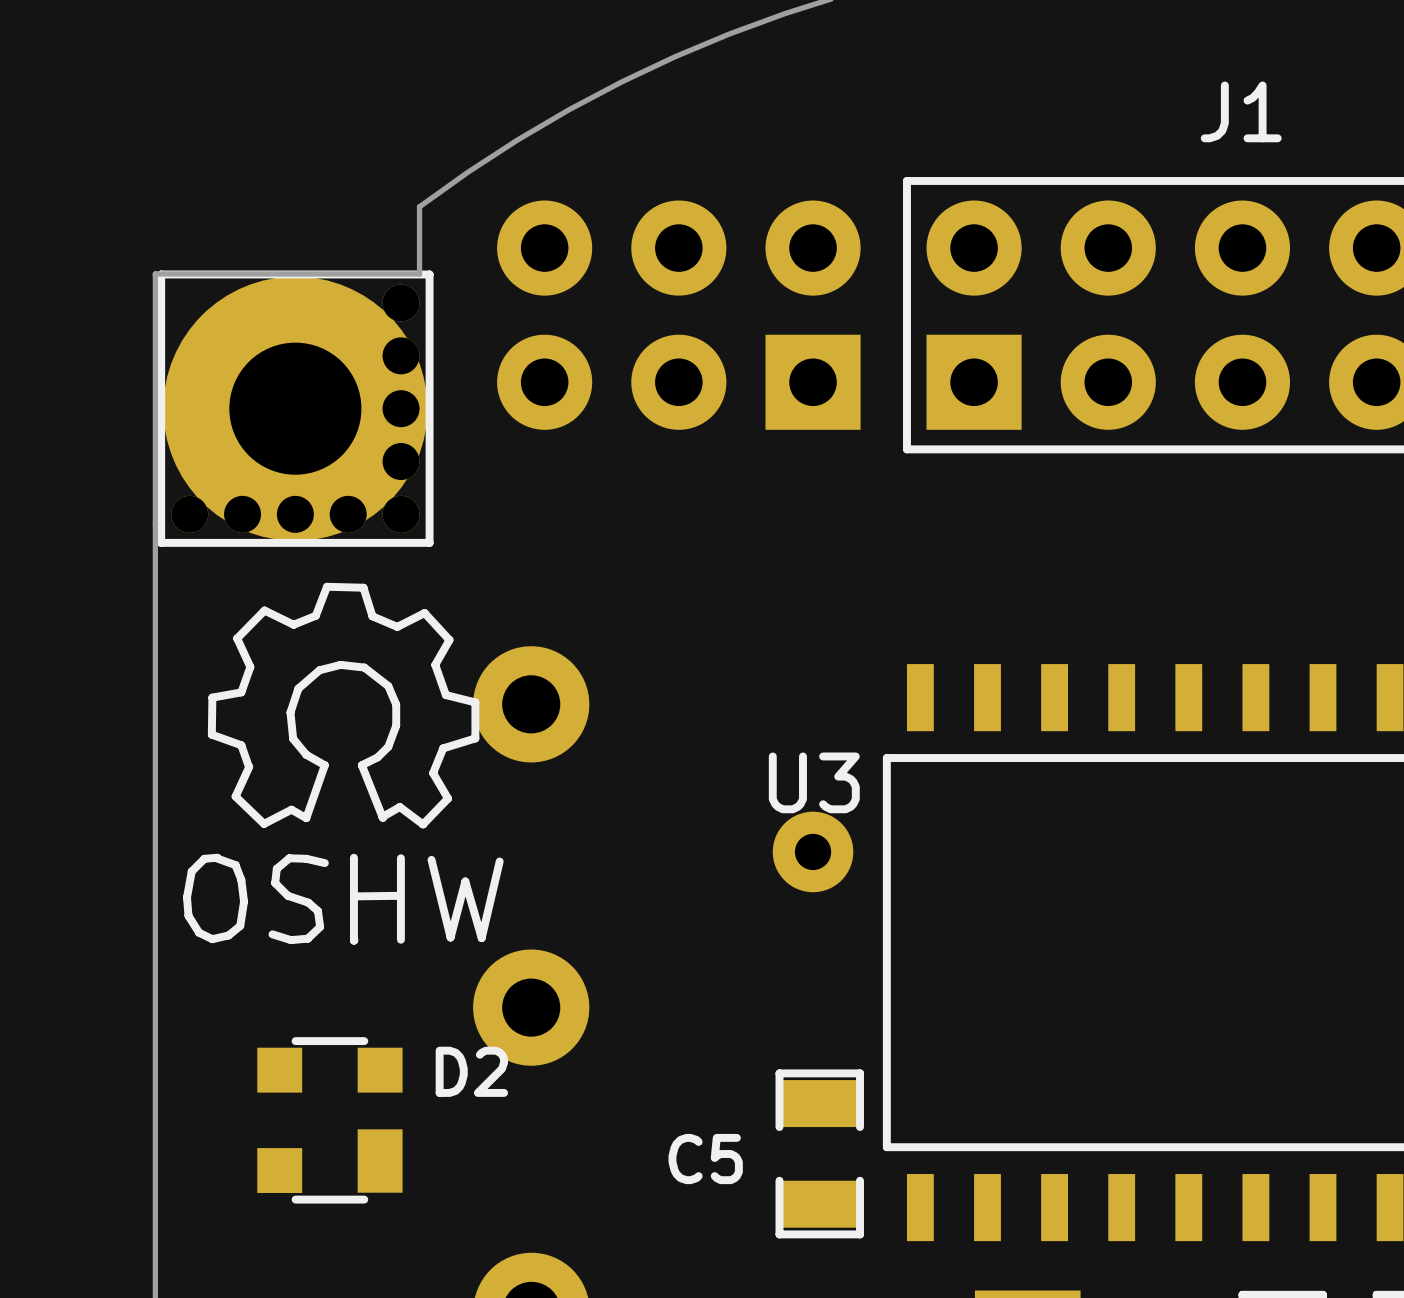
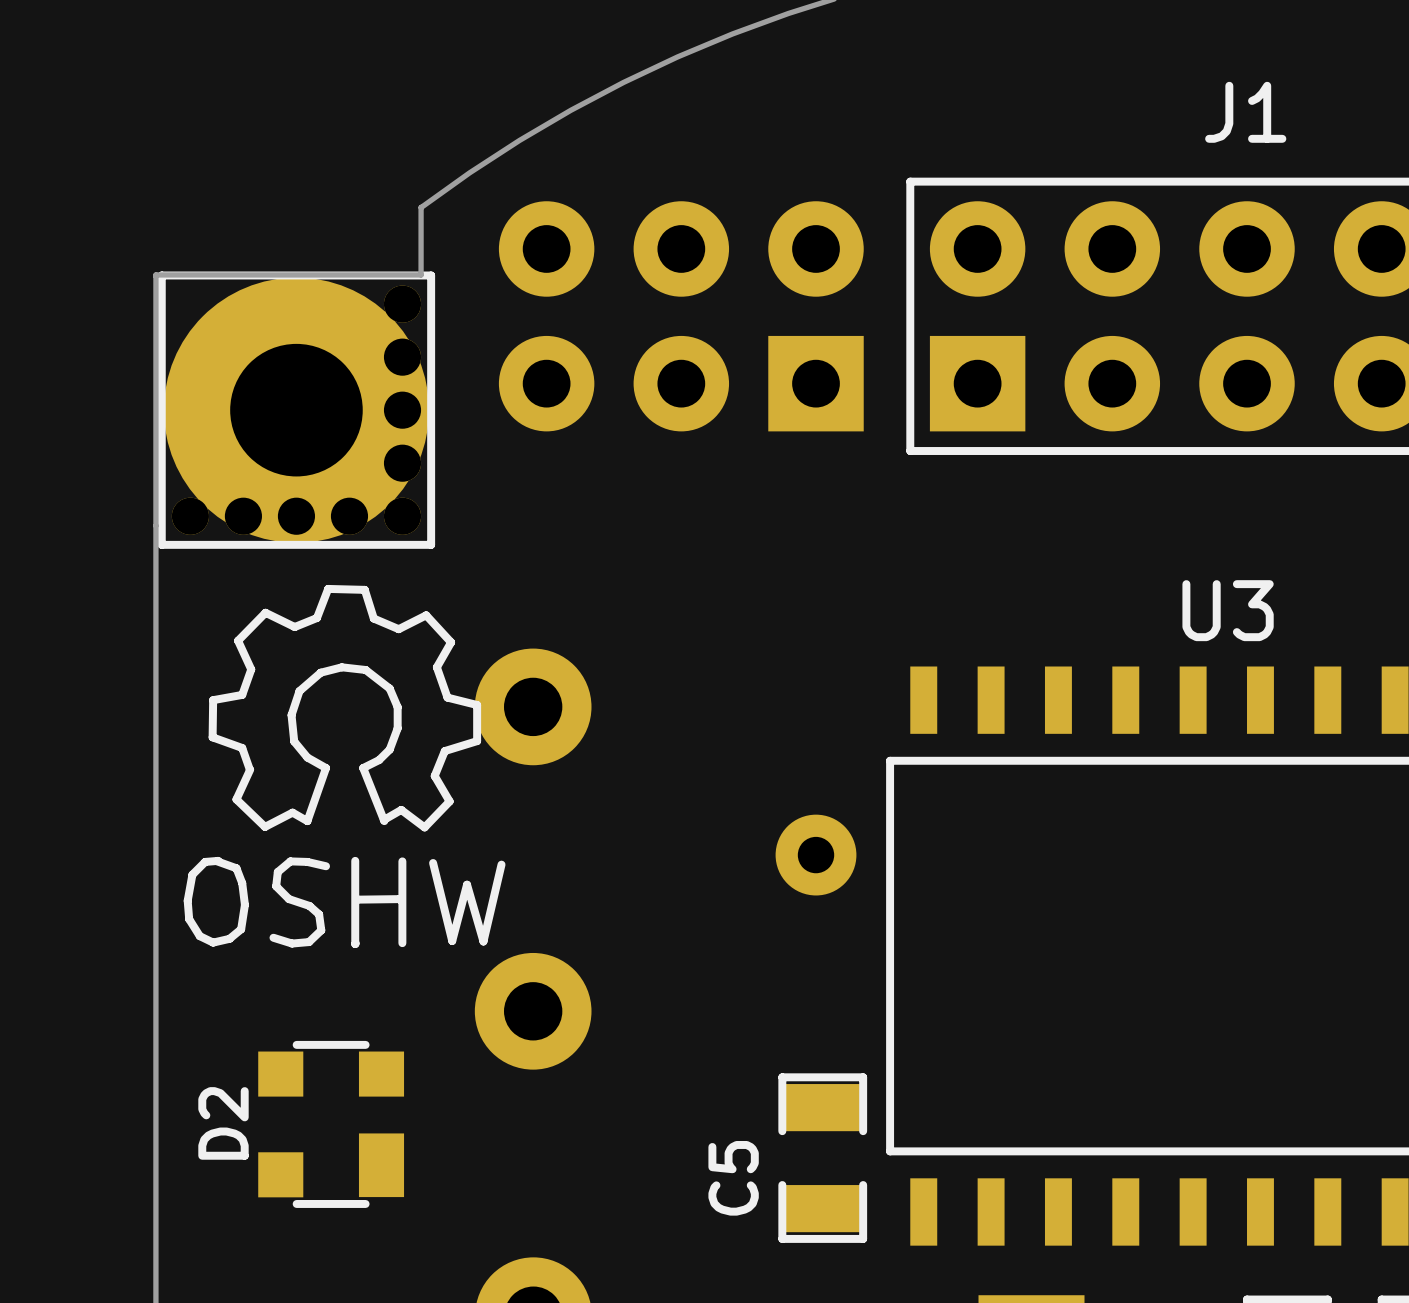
U3 name position: U3 (814, 782) -> U3 (1228, 610)
D2 name rotation: 0° (471, 1071) -> 90° counterclockwise (223, 1123)
D2 name position: D2 (471, 1071) -> D2 (223, 1123)
C5 name rotation: 0° (705, 1159) -> 90° counterclockwise (733, 1178)

